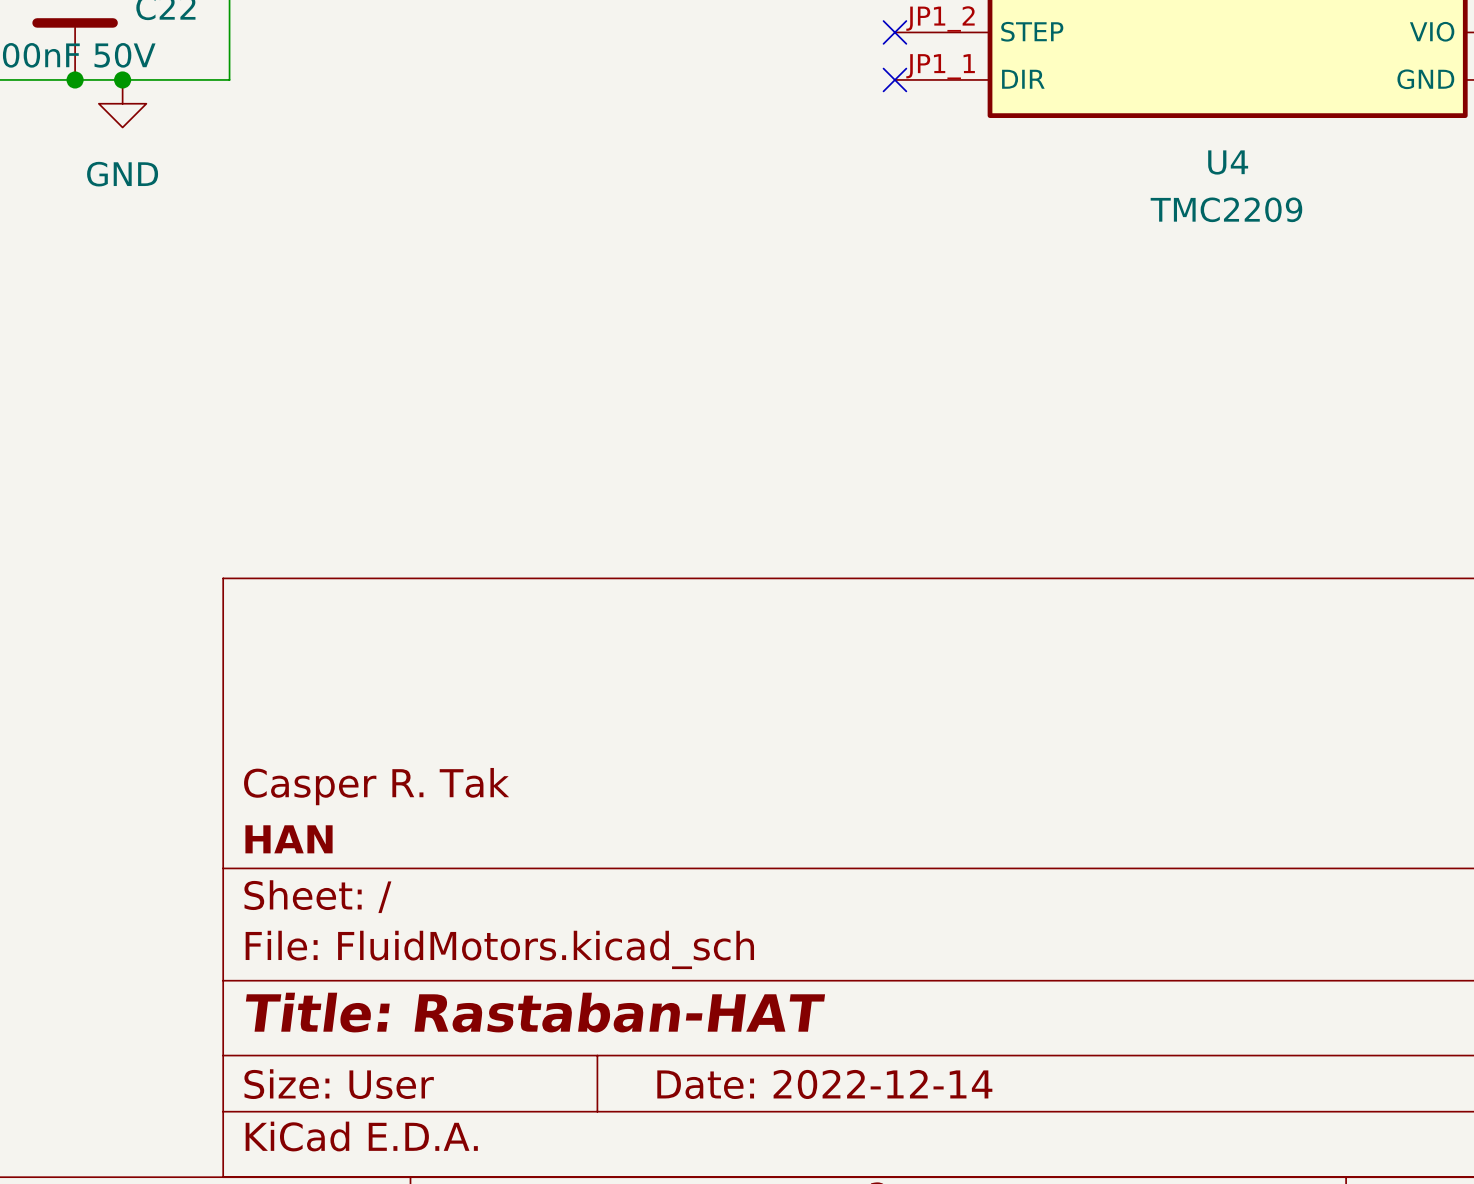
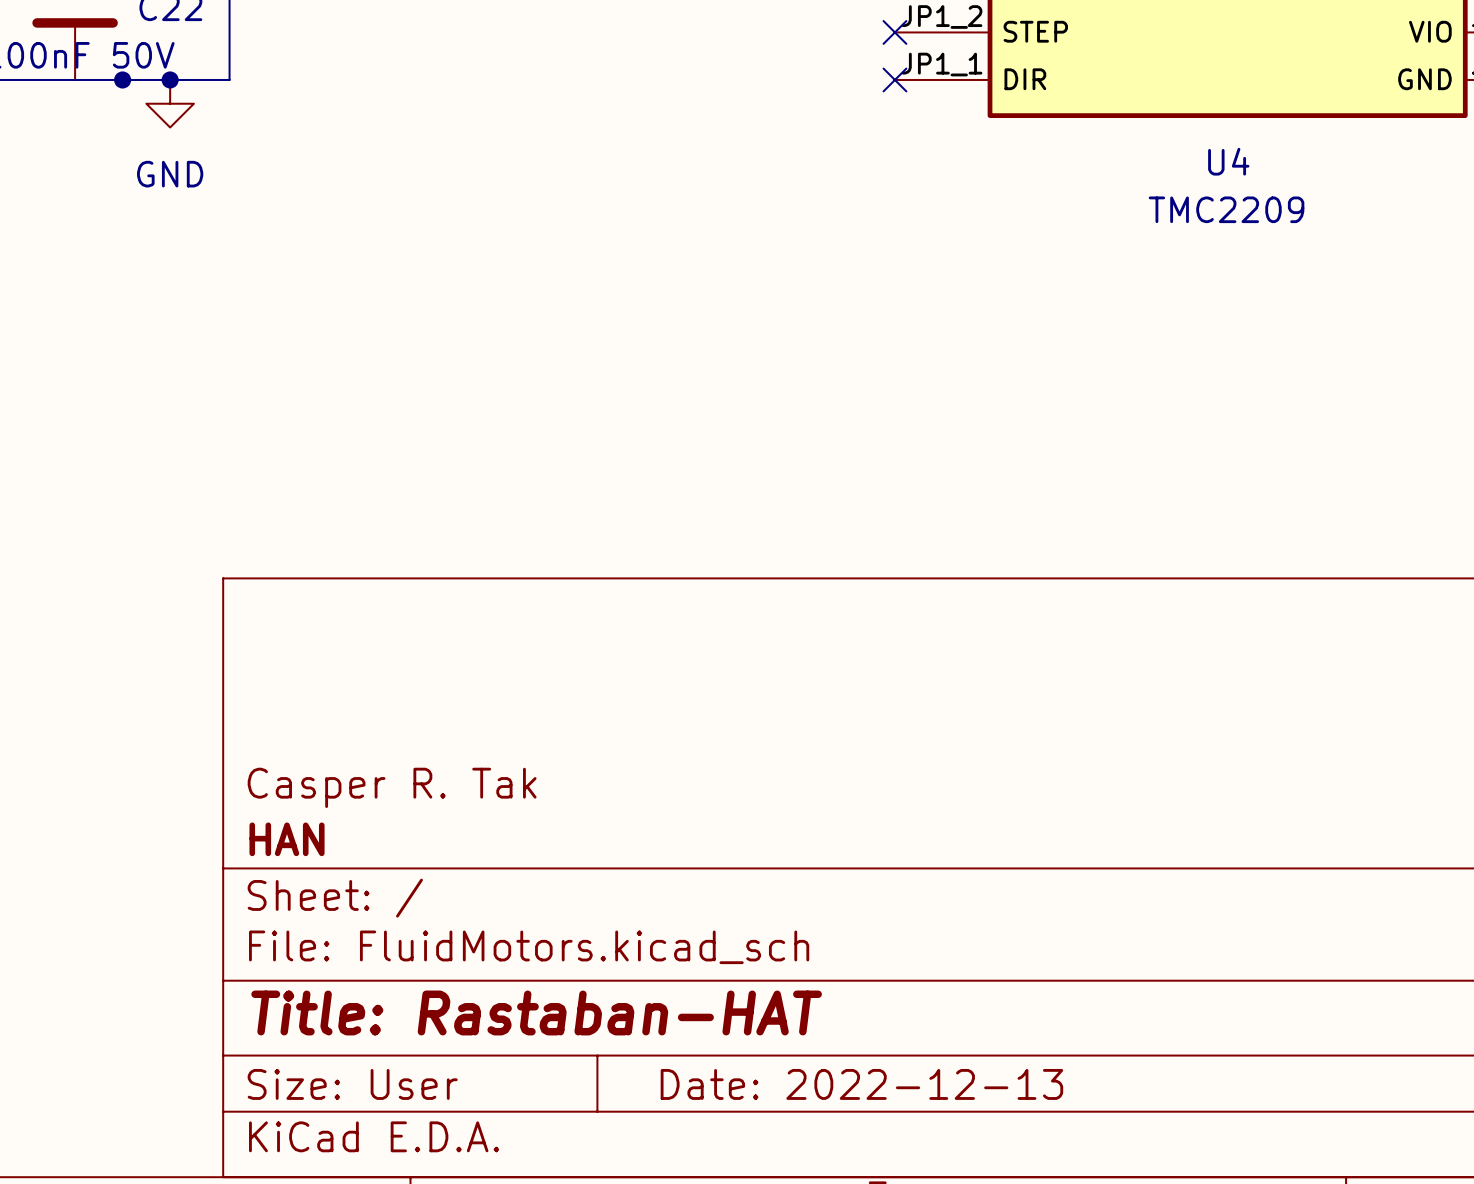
junction position: (75, 79) -> (170, 79)
power symbol position: GND (122, 103) -> GND (170, 103)
title block: Date: 2022-12-14 (824, 1084) -> Date: 2022-12-13 (861, 1084)

